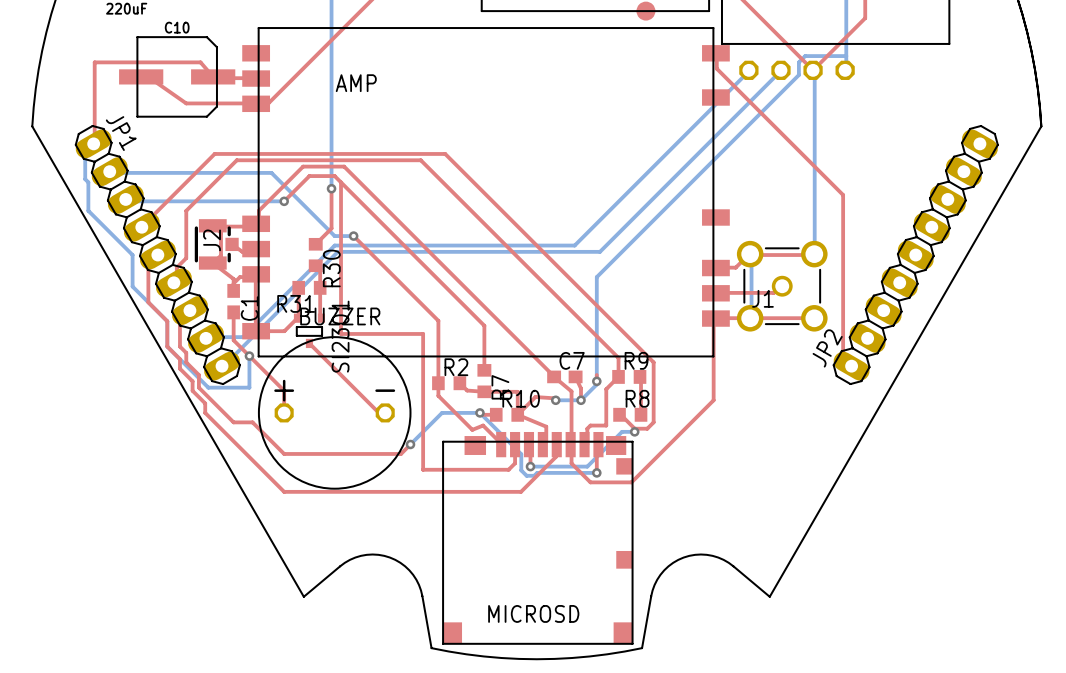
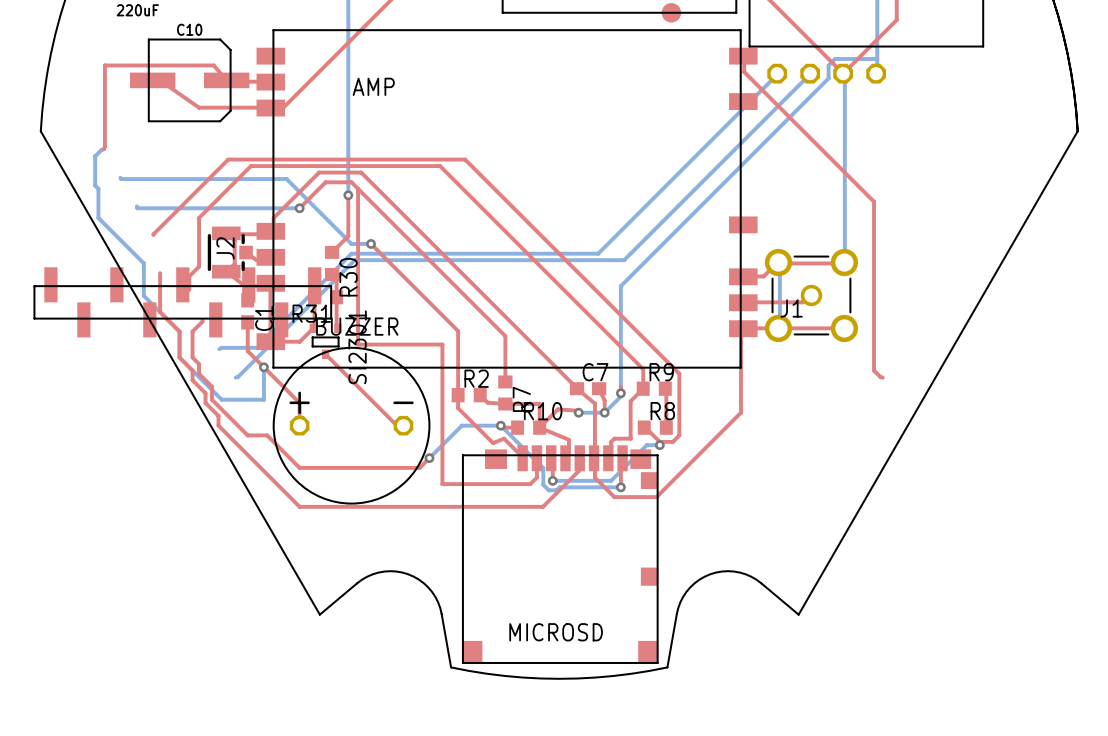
JP1: (157, 255) -> none
JP2: (915, 255) -> none
part: none -> (182, 302)

